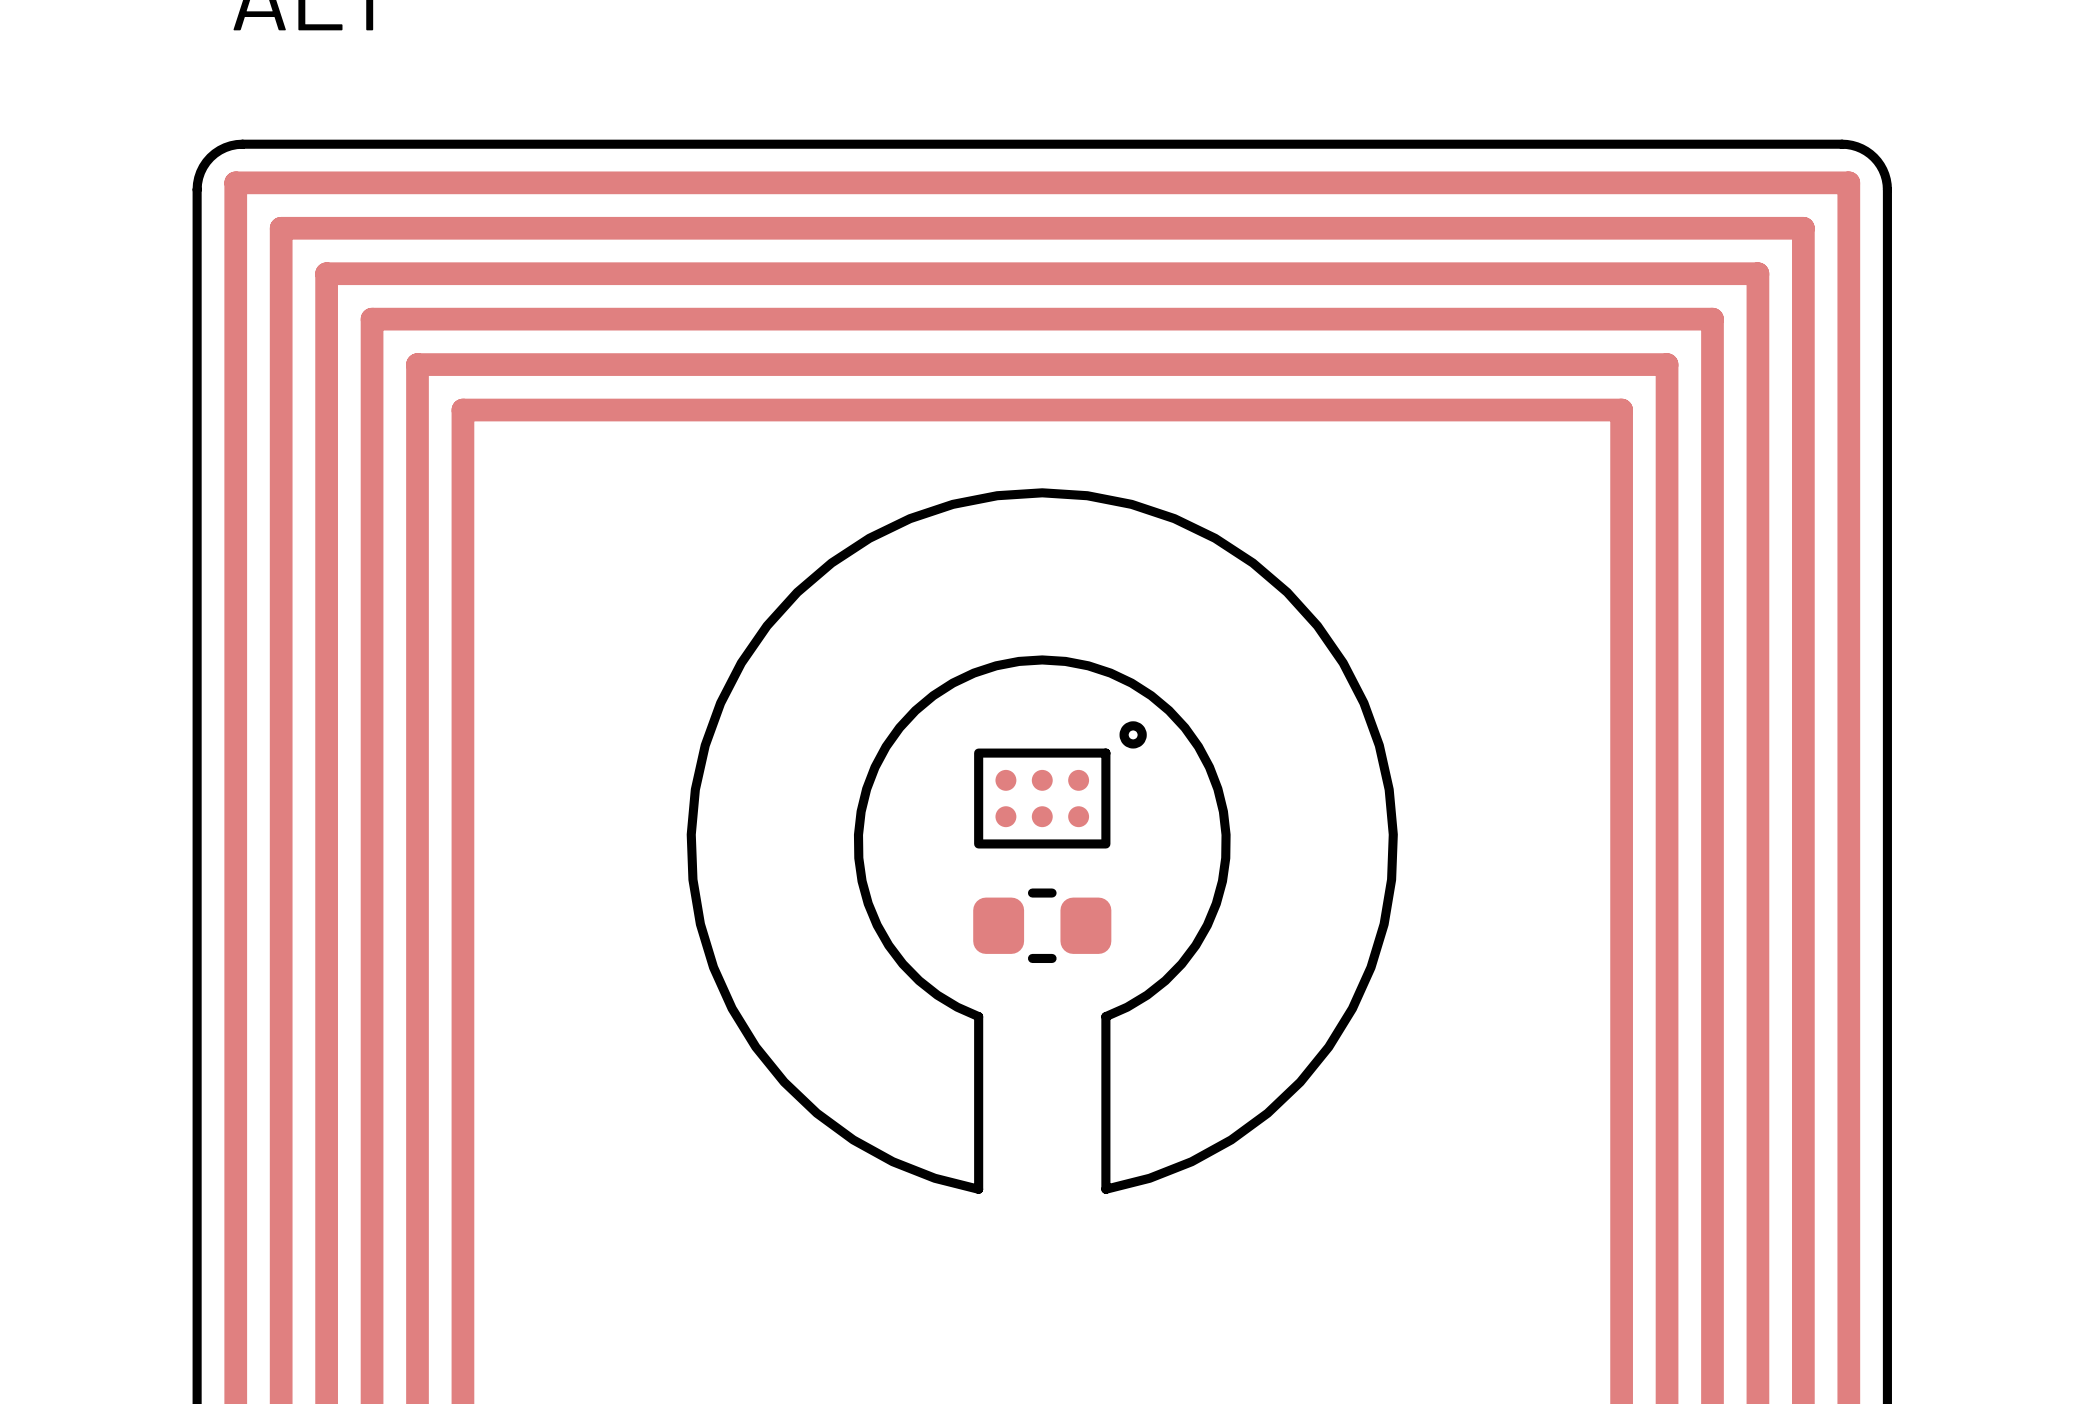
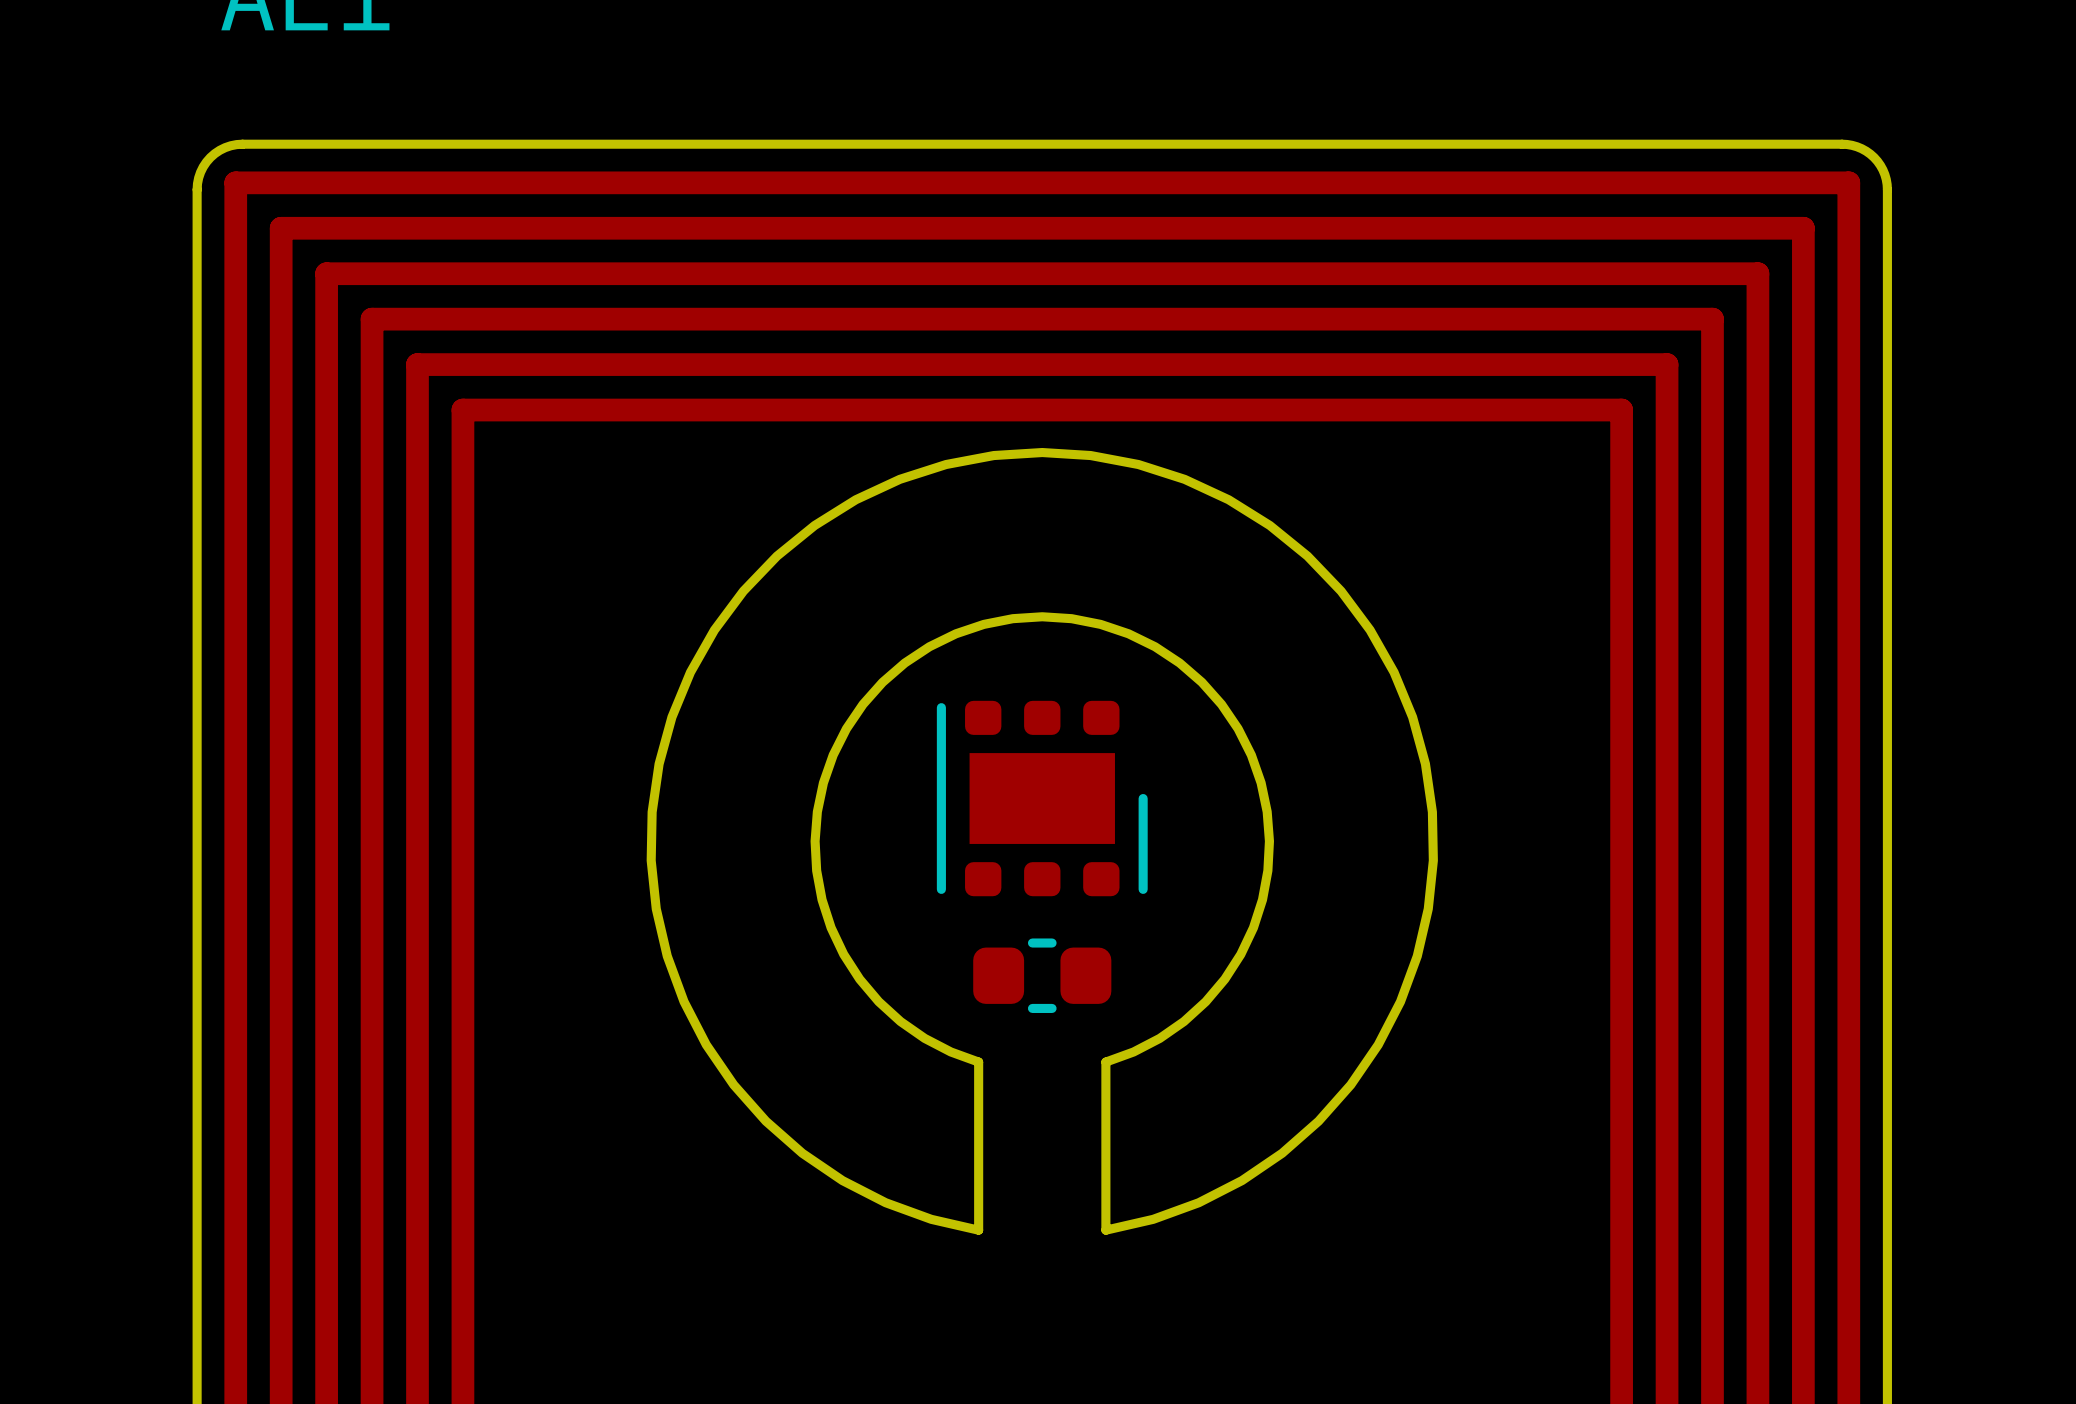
part footprint: [974, 721, 1147, 849] -> [936, 700, 1148, 897]
part position: (1042, 925) -> (1042, 975)
board edge: (978, 1062) (978, 1016) (957, 1007) (919, 980) (888, 945) (877, 925) (862, 881) (858, 858) (861, 811) (866, 789) (886, 746) (915, 710) (952, 683) (973, 673) (996, 665) (1042, 659) (1065, 661) (1110, 673) (1151, 695) (1184, 727) (1198, 746) (1209, 767) (1223, 811) (1226, 834) (1222, 881) (1207, 925) (1195, 945) (1165, 980) (1127, 1007) (1105, 1016) (1105, 1062) -> (978, 1062) (950, 1051) (924, 1038) (900, 1021) (878, 1001) (859, 979) (843, 954) (831, 927) (822, 899) (816, 870) (815, 841) (817, 811) (823, 782) (833, 755) (846, 728) (863, 704) (882, 682) (904, 663) (929, 646) (955, 633) (983, 624) (1012, 618) (1042, 616) (1071, 618) (1100, 624) (1128, 633) (1155, 646) (1179, 663) (1201, 682) (1221, 704) (1238, 728) (1251, 755) (1261, 782) (1267, 811) (1269, 841) (1267, 870) (1262, 899) (1253, 927) (1240, 954) (1224, 979) (1205, 1001) (1183, 1021) (1159, 1038) (1133, 1051) (1105, 1062)
board edge: (978, 1189) (934, 1178) (892, 1161) (853, 1139) (816, 1113) (784, 1082) (755, 1047) (732, 1008) (713, 967) (700, 924) (692, 879) (691, 834) (695, 789) (705, 745) (720, 703) (741, 662) (767, 625) (797, 592) (831, 563) (869, 538) (910, 518) (952, 504) (997, 495) (1042, 492) (1087, 495) (1131, 504) (1174, 518) (1215, 538) (1252, 563) (1287, 592) (1317, 625) (1343, 662) (1363, 703) (1379, 745) (1389, 789) (1393, 834) (1391, 879) (1384, 924) (1371, 967) (1352, 1008) (1328, 1047) (1300, 1082) (1267, 1113) (1231, 1139) (1191, 1161) (1149, 1178) (1105, 1189) -> (978, 1189) (978, 1230) (931, 1219) (885, 1202) (842, 1180) (802, 1153) (765, 1121) (733, 1084) (706, 1044) (684, 1001) (667, 956) (656, 908) (651, 860) (652, 812) (659, 764) (671, 717) (690, 672) (714, 630) (743, 591) (777, 556) (814, 525) (855, 499) (899, 479) (946, 464) (993, 455) (1042, 452) (1090, 455) (1138, 464) (1184, 479) (1228, 499) (1269, 525) (1307, 556) (1341, 591) (1370, 630) (1394, 672) (1412, 717) (1425, 764) (1432, 812) (1433, 860) (1428, 908) (1417, 956) (1400, 1001) (1378, 1044) (1350, 1084) (1318, 1121) (1282, 1153) (1242, 1180) (1198, 1202) (1153, 1219) (1105, 1230) (1105, 1189)

